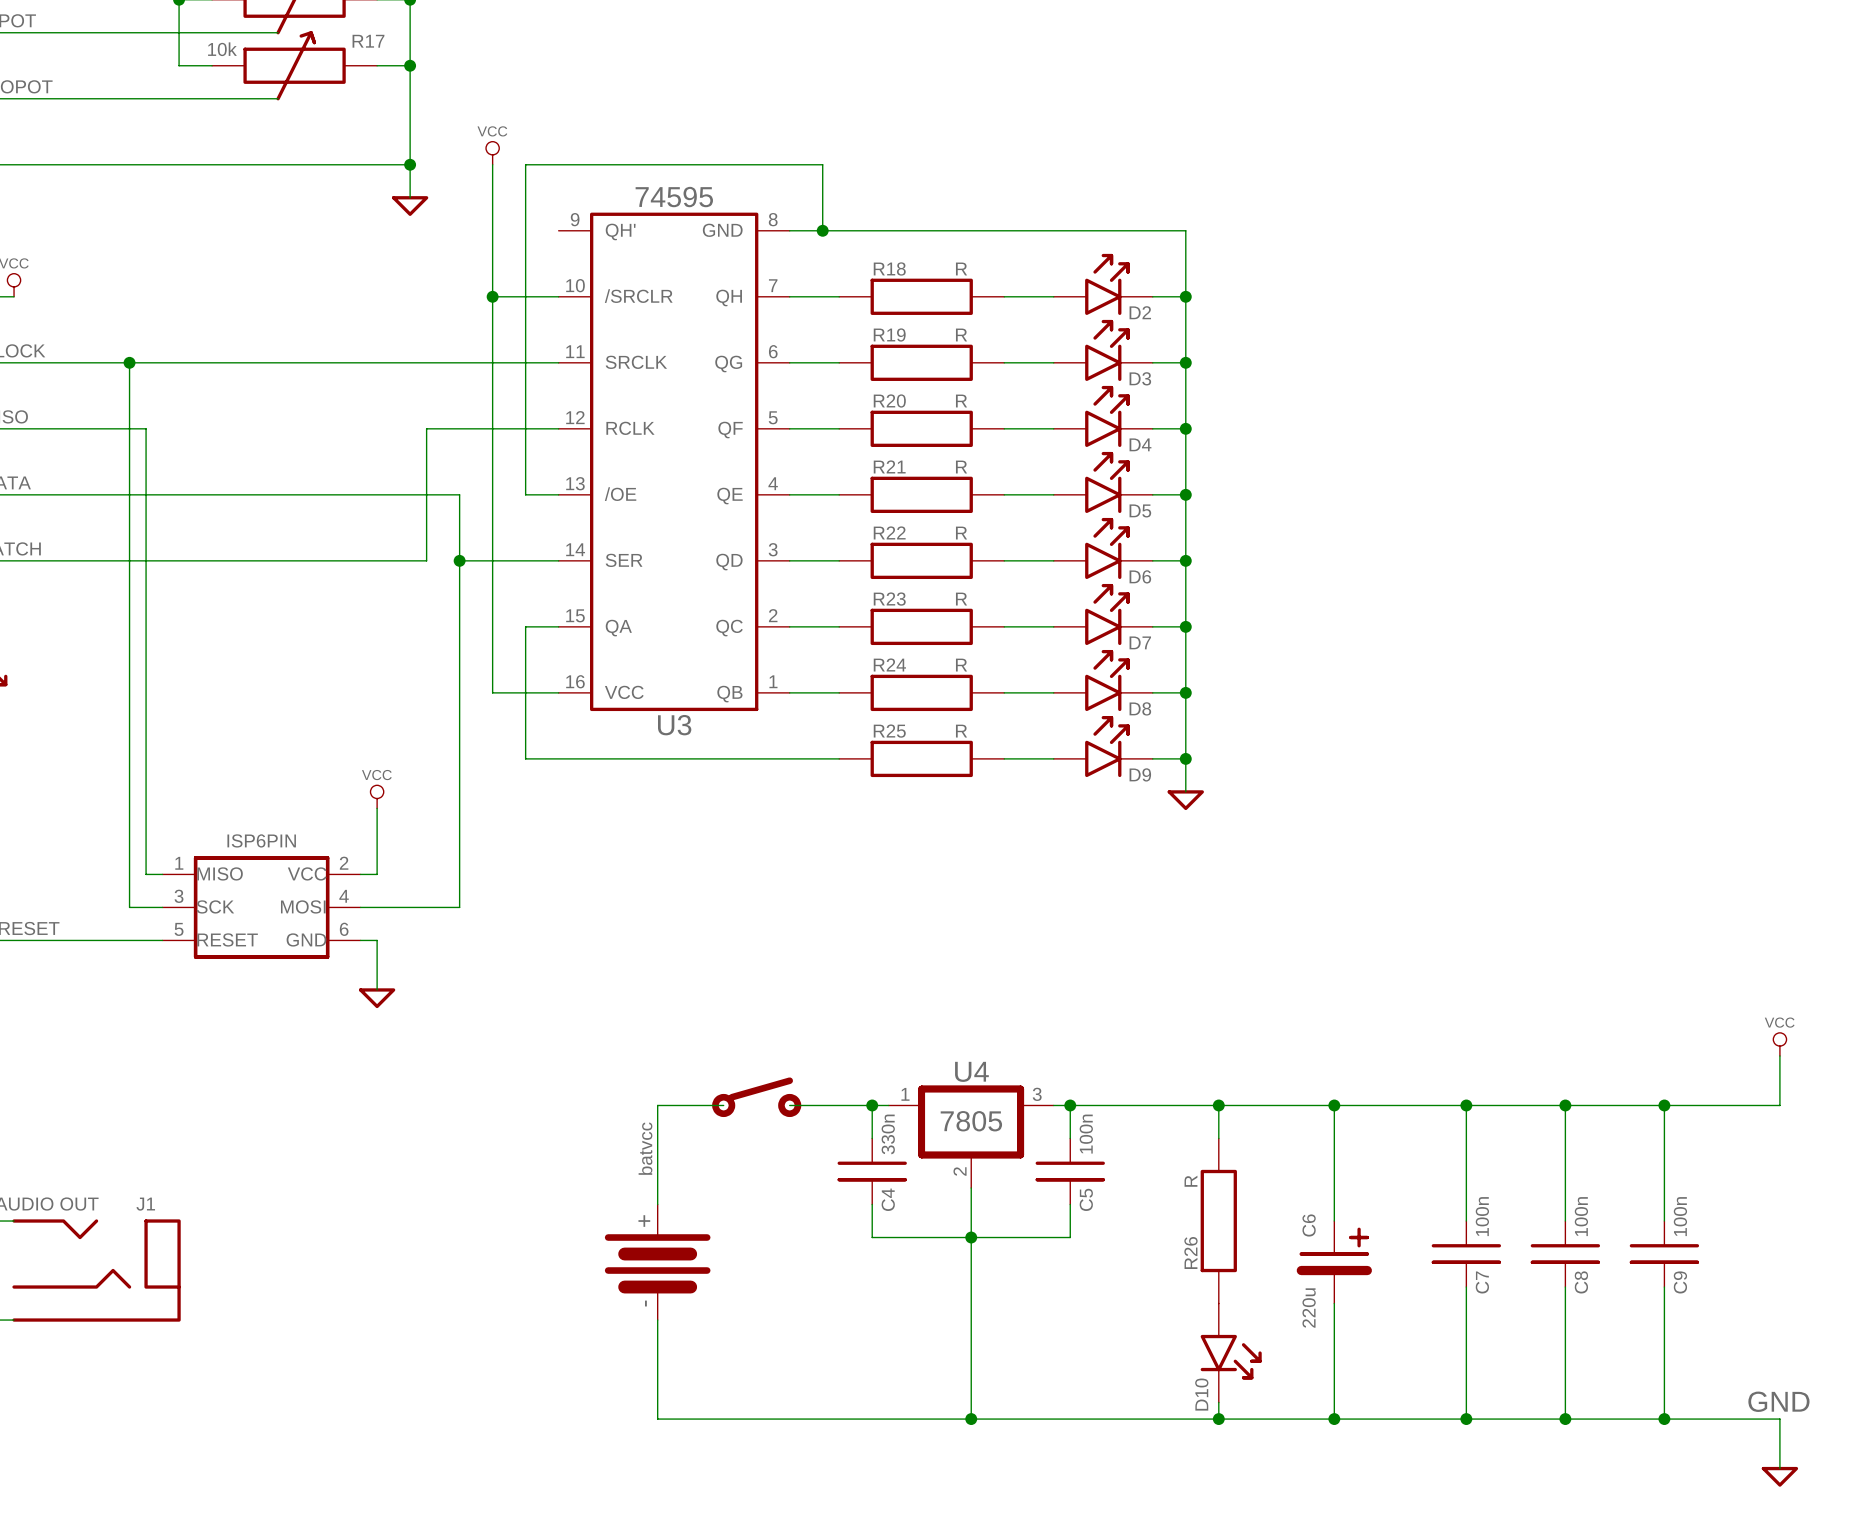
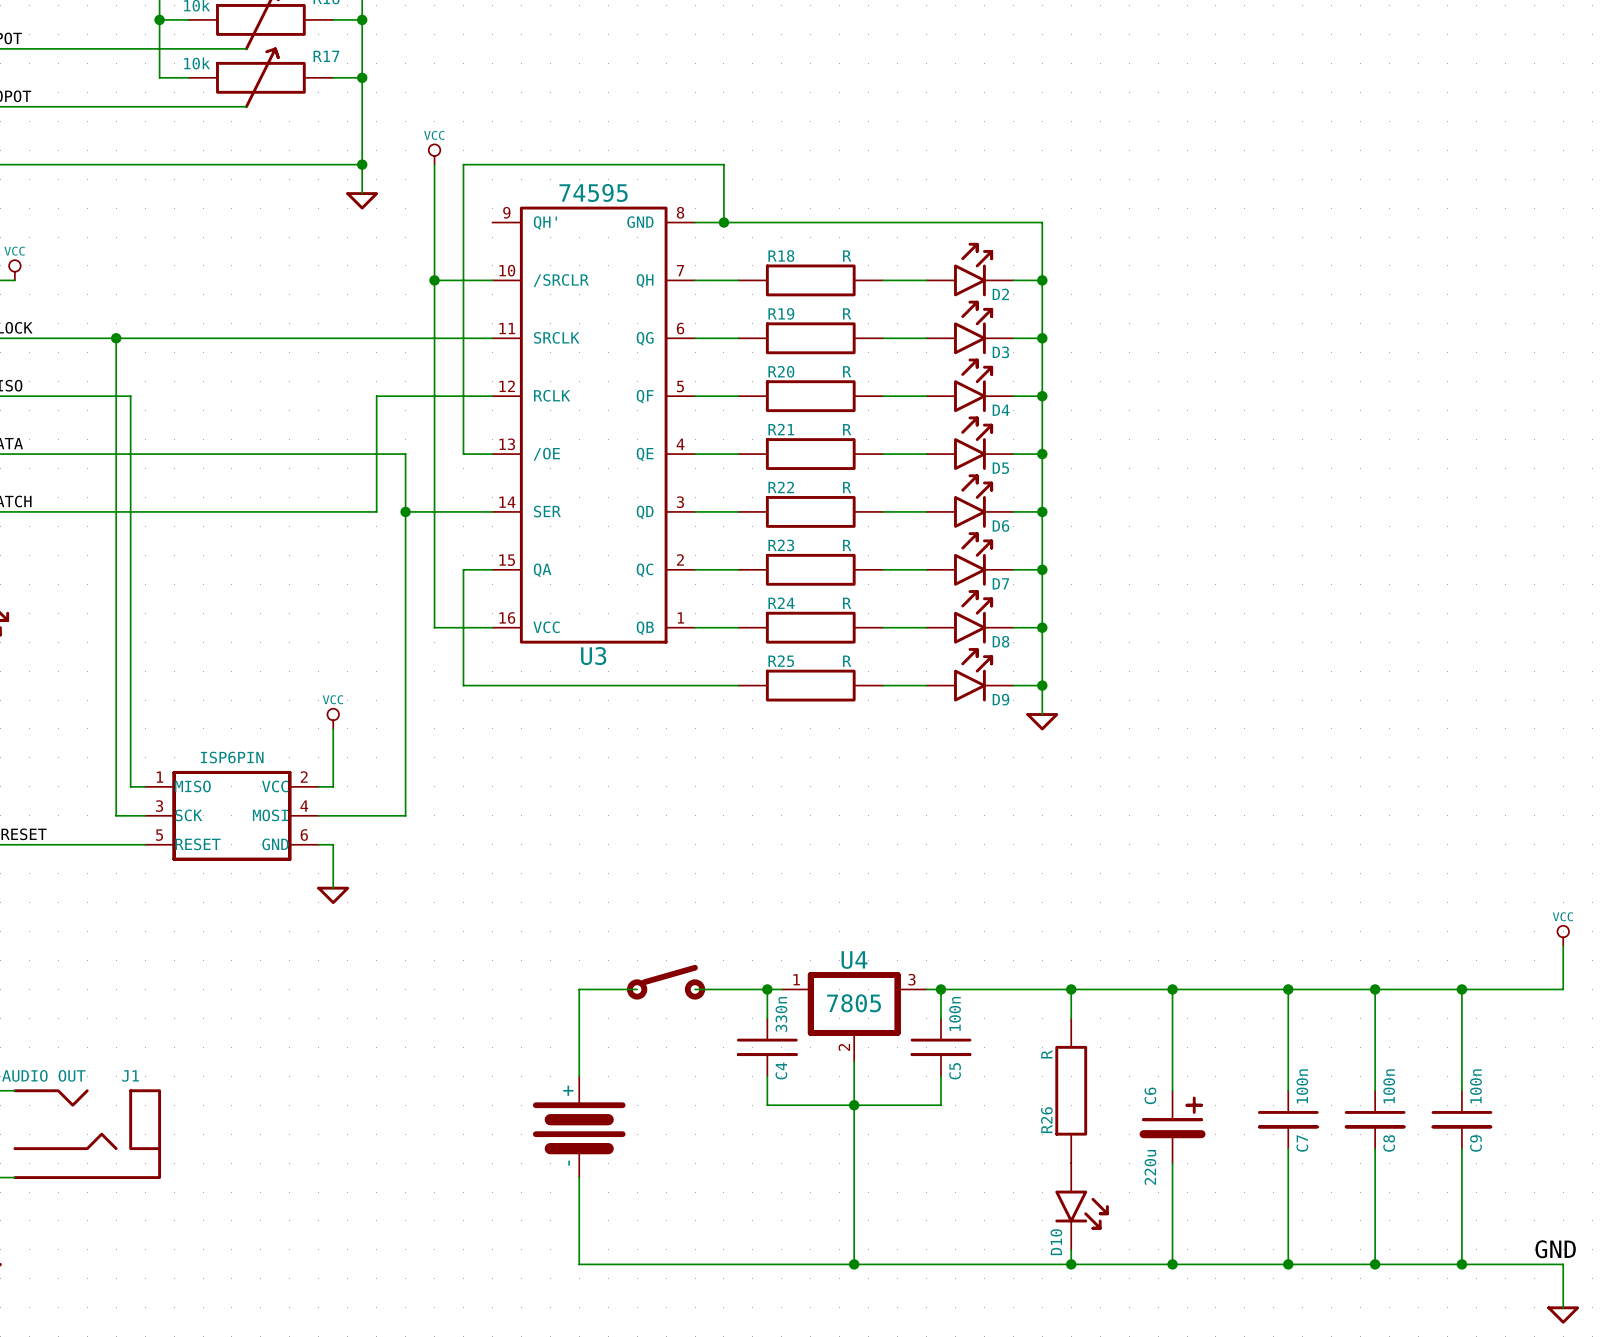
label: batvcc (645, 1148) -> none

